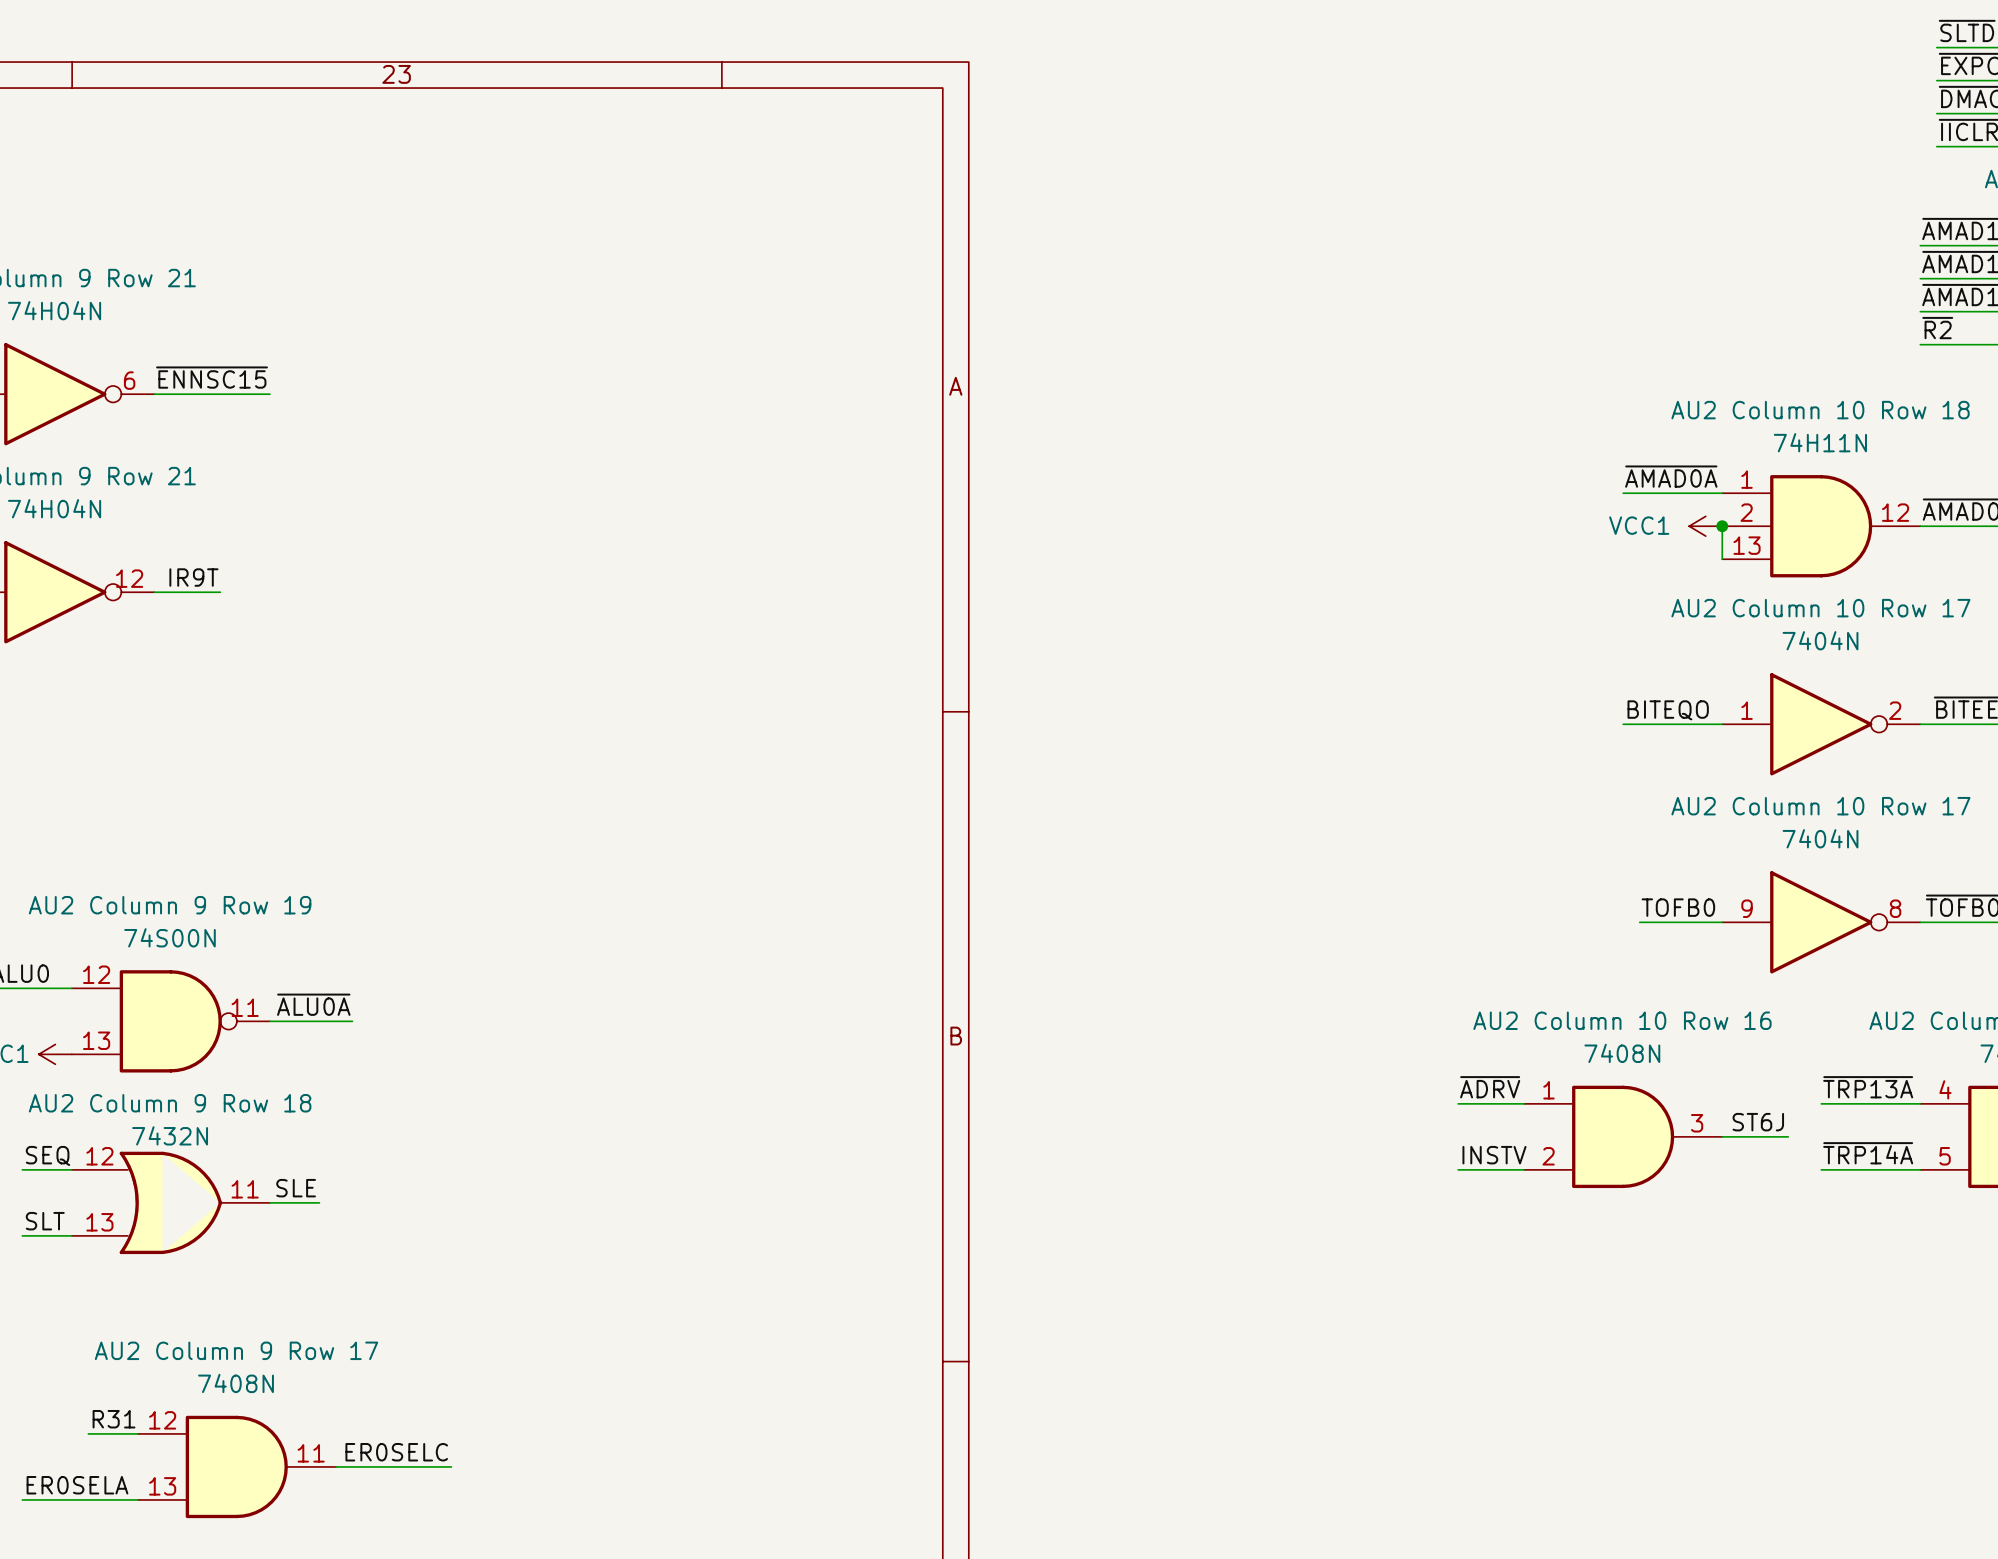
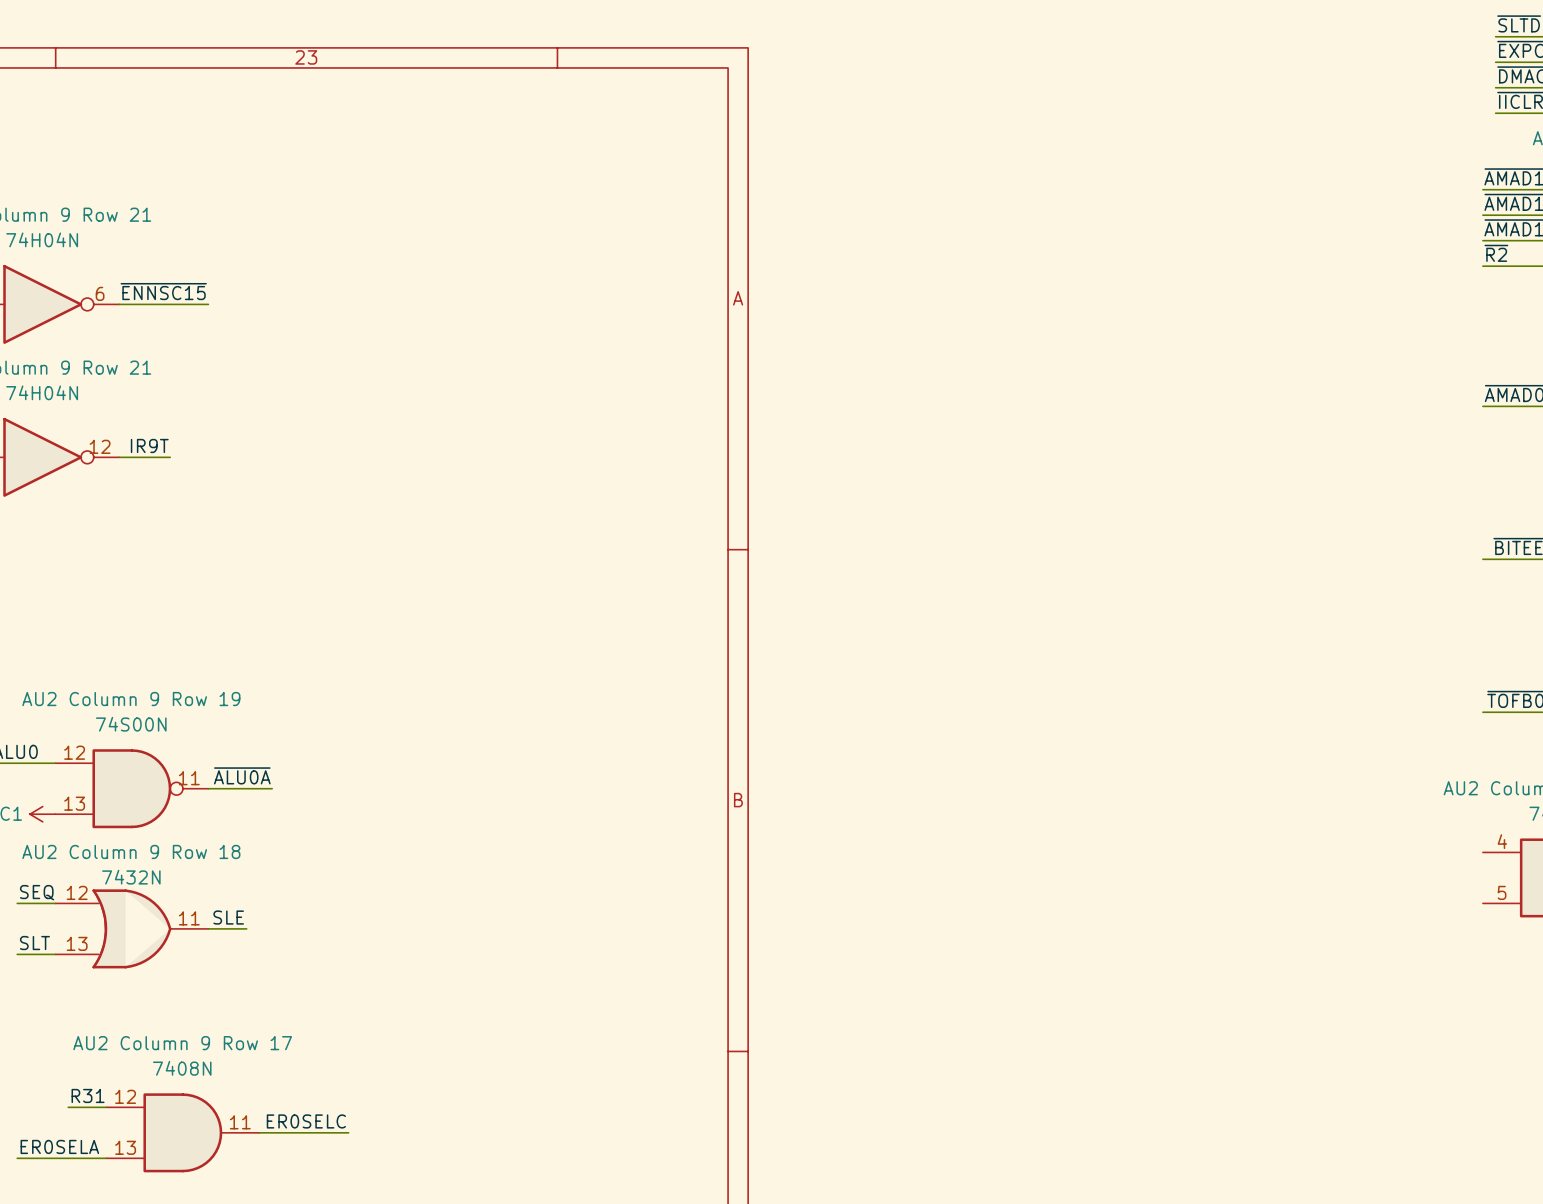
label: ~{AMAD0A} (1671, 476) -> none
wire: (1623, 493) (1722, 493) -> none
power symbol: VCC1 (1705, 526) -> none
wire: (1722, 526) (1722, 559) -> none
junction: (1722, 526) -> none
part: 74H11N (1821, 526) -> none
label: BITEQO (1668, 710) -> none
wire: (1623, 724) (1722, 724) -> none
part: 7404N (1821, 724) -> none
label: TOFB0 (1678, 907) -> none
wire: (1639, 922) (1722, 922) -> none
part: 7404N (1821, 922) -> none
label: ~{ADRV} (1490, 1087) -> none
label: ~{TRP13A} (1868, 1087) -> none
wire: (1458, 1103) (1524, 1103) -> none
wire: (1821, 1103) (1920, 1103) -> none
label: ST6J (1758, 1122) -> none
part: 7408N (1623, 1136) -> none
wire: (1722, 1136) (1788, 1136) -> none
label: ~{TRP14A} (1868, 1153) -> none
label: INSTV (1494, 1155) -> none
wire: (1458, 1169) (1524, 1169) -> none
wire: (1821, 1169) (1920, 1169) -> none

